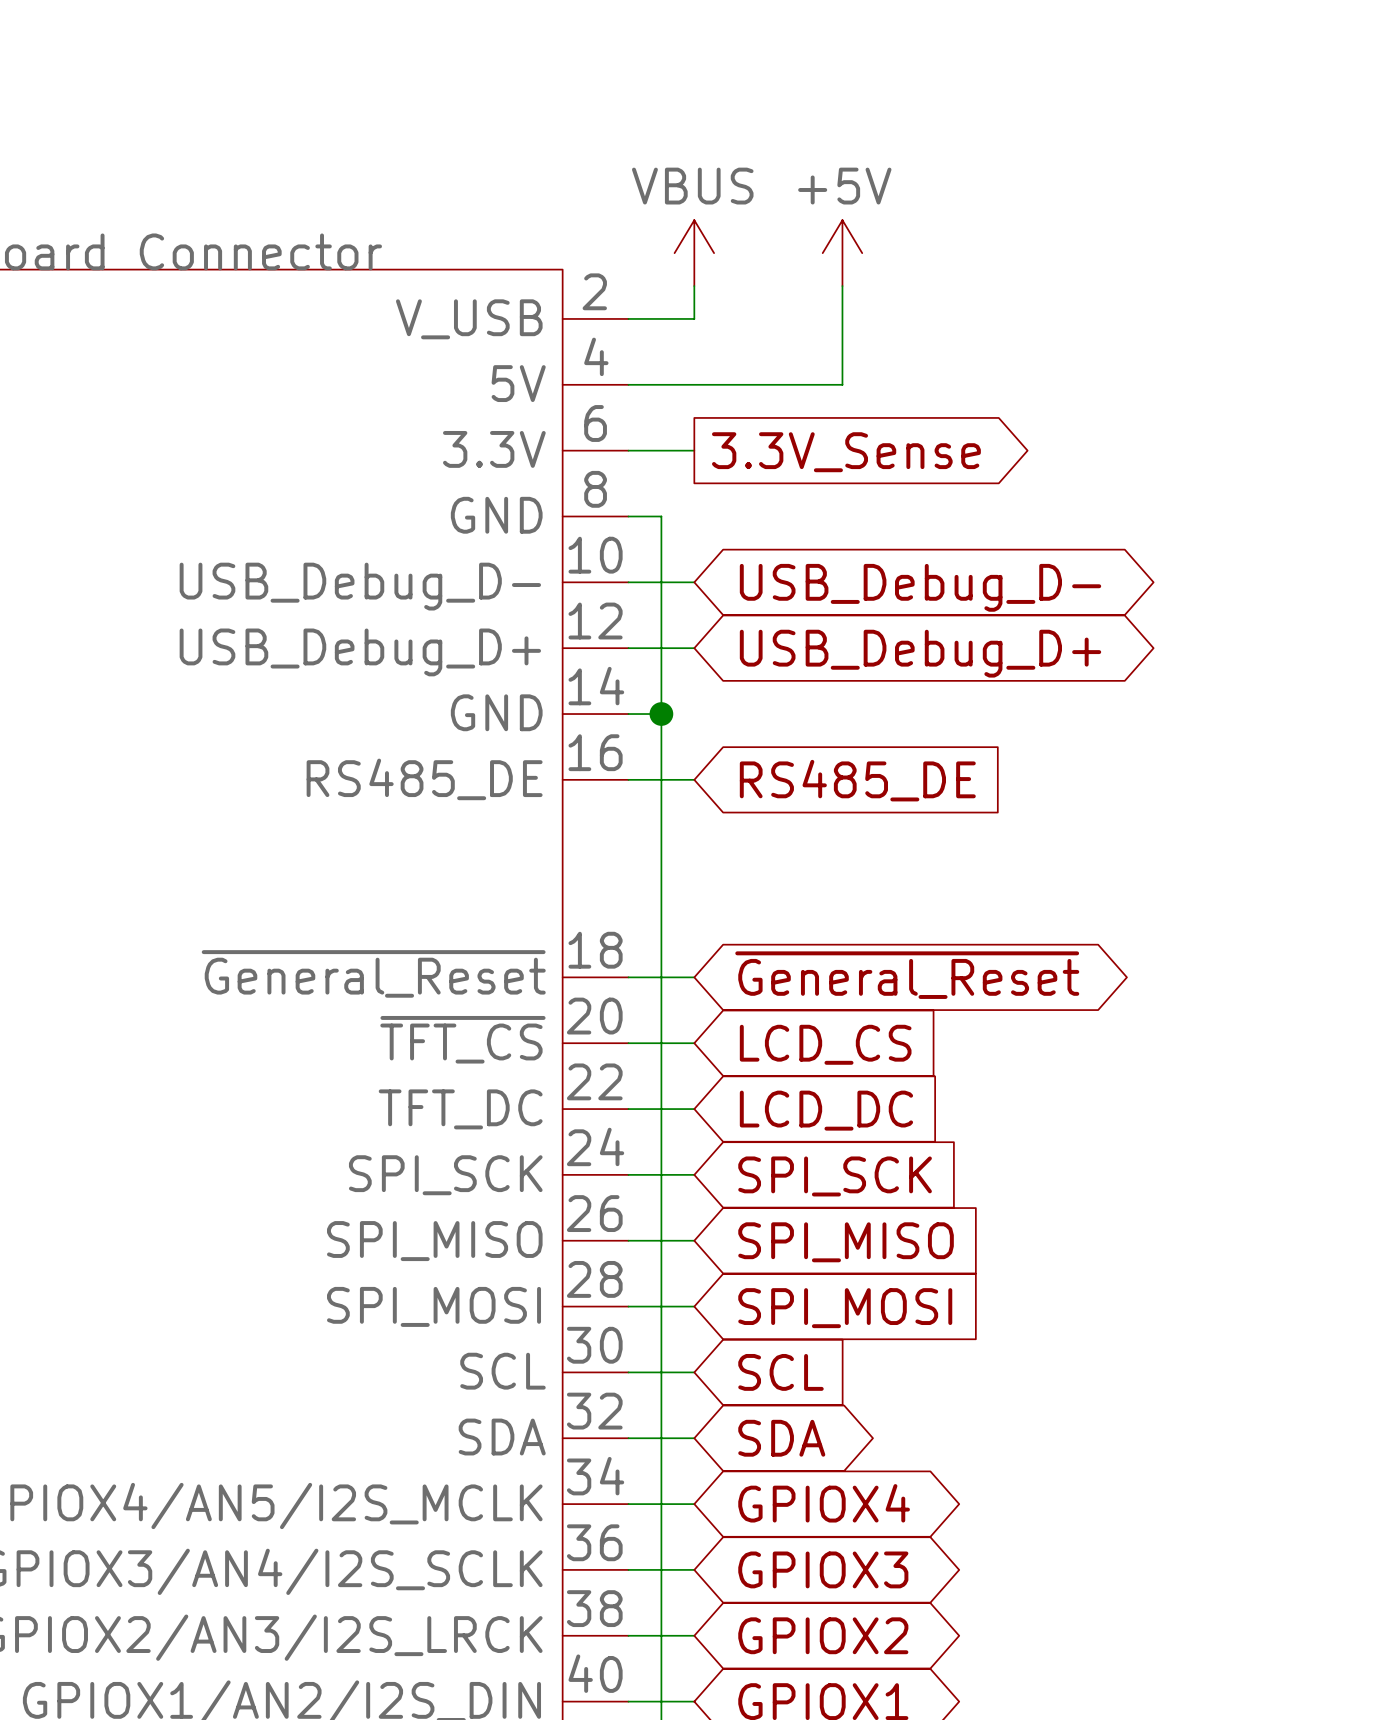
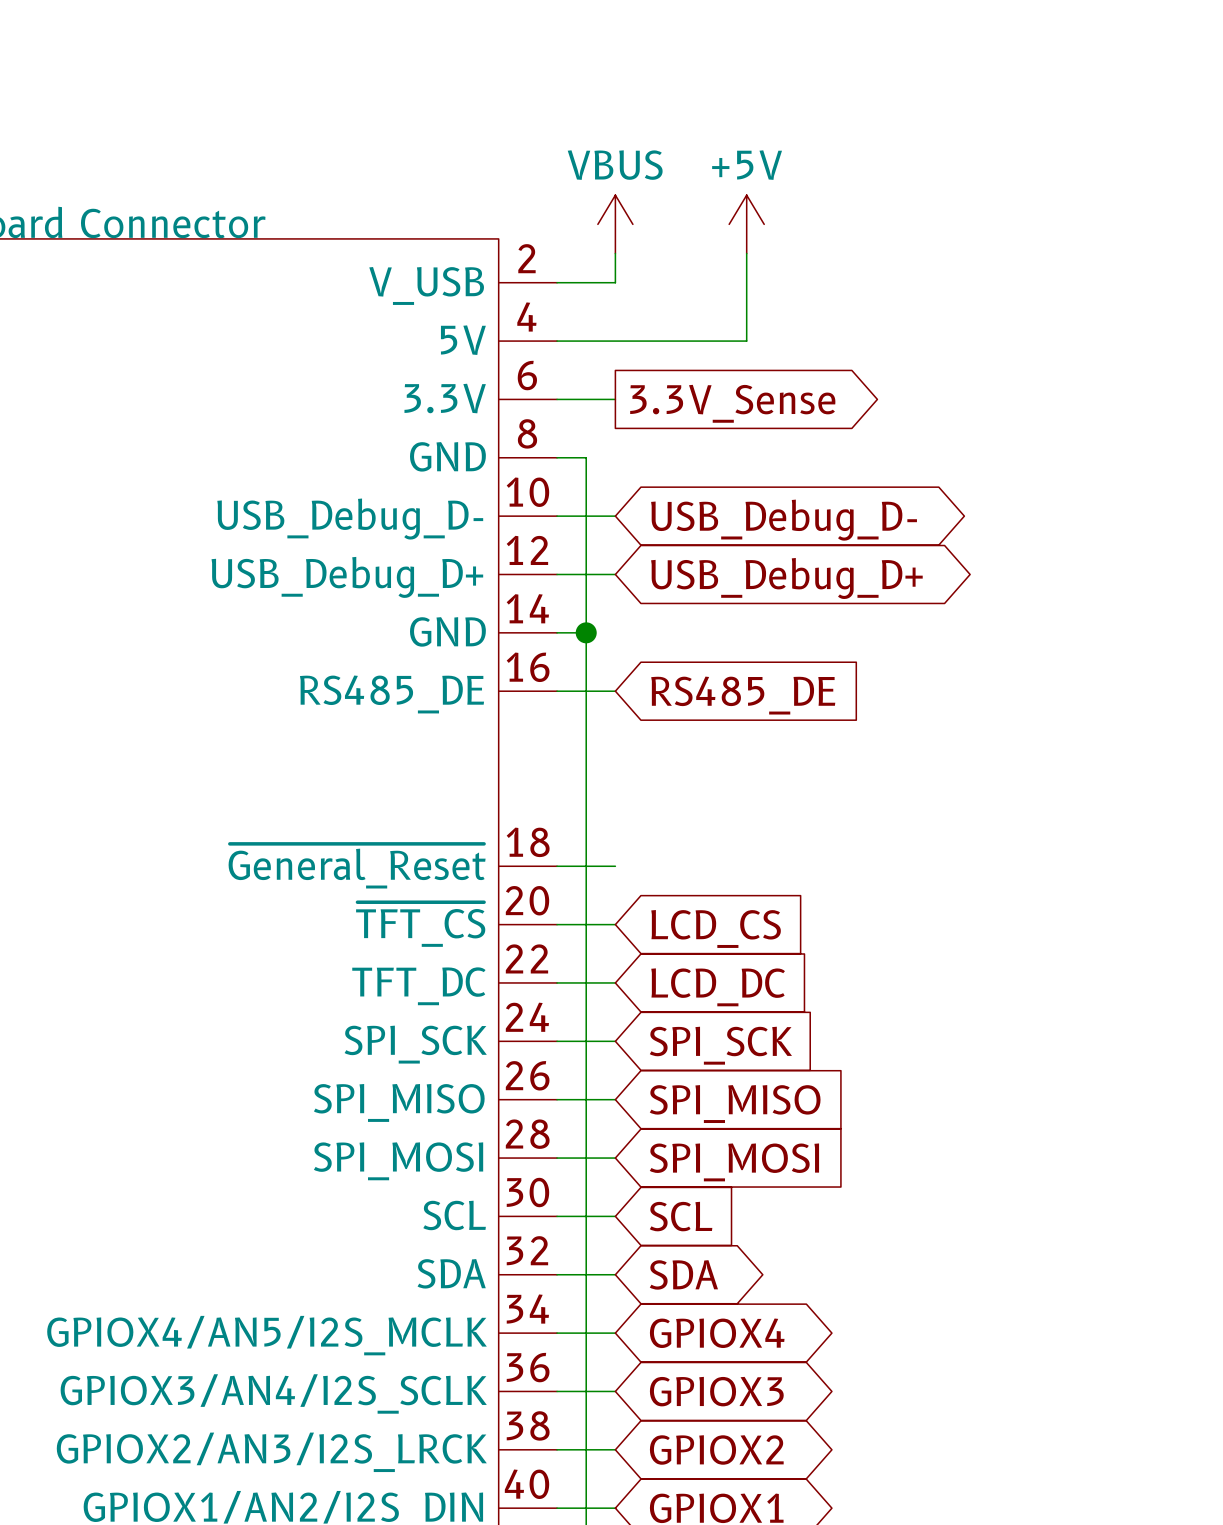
global label: ~{General_Reset} (907, 975) -> none

